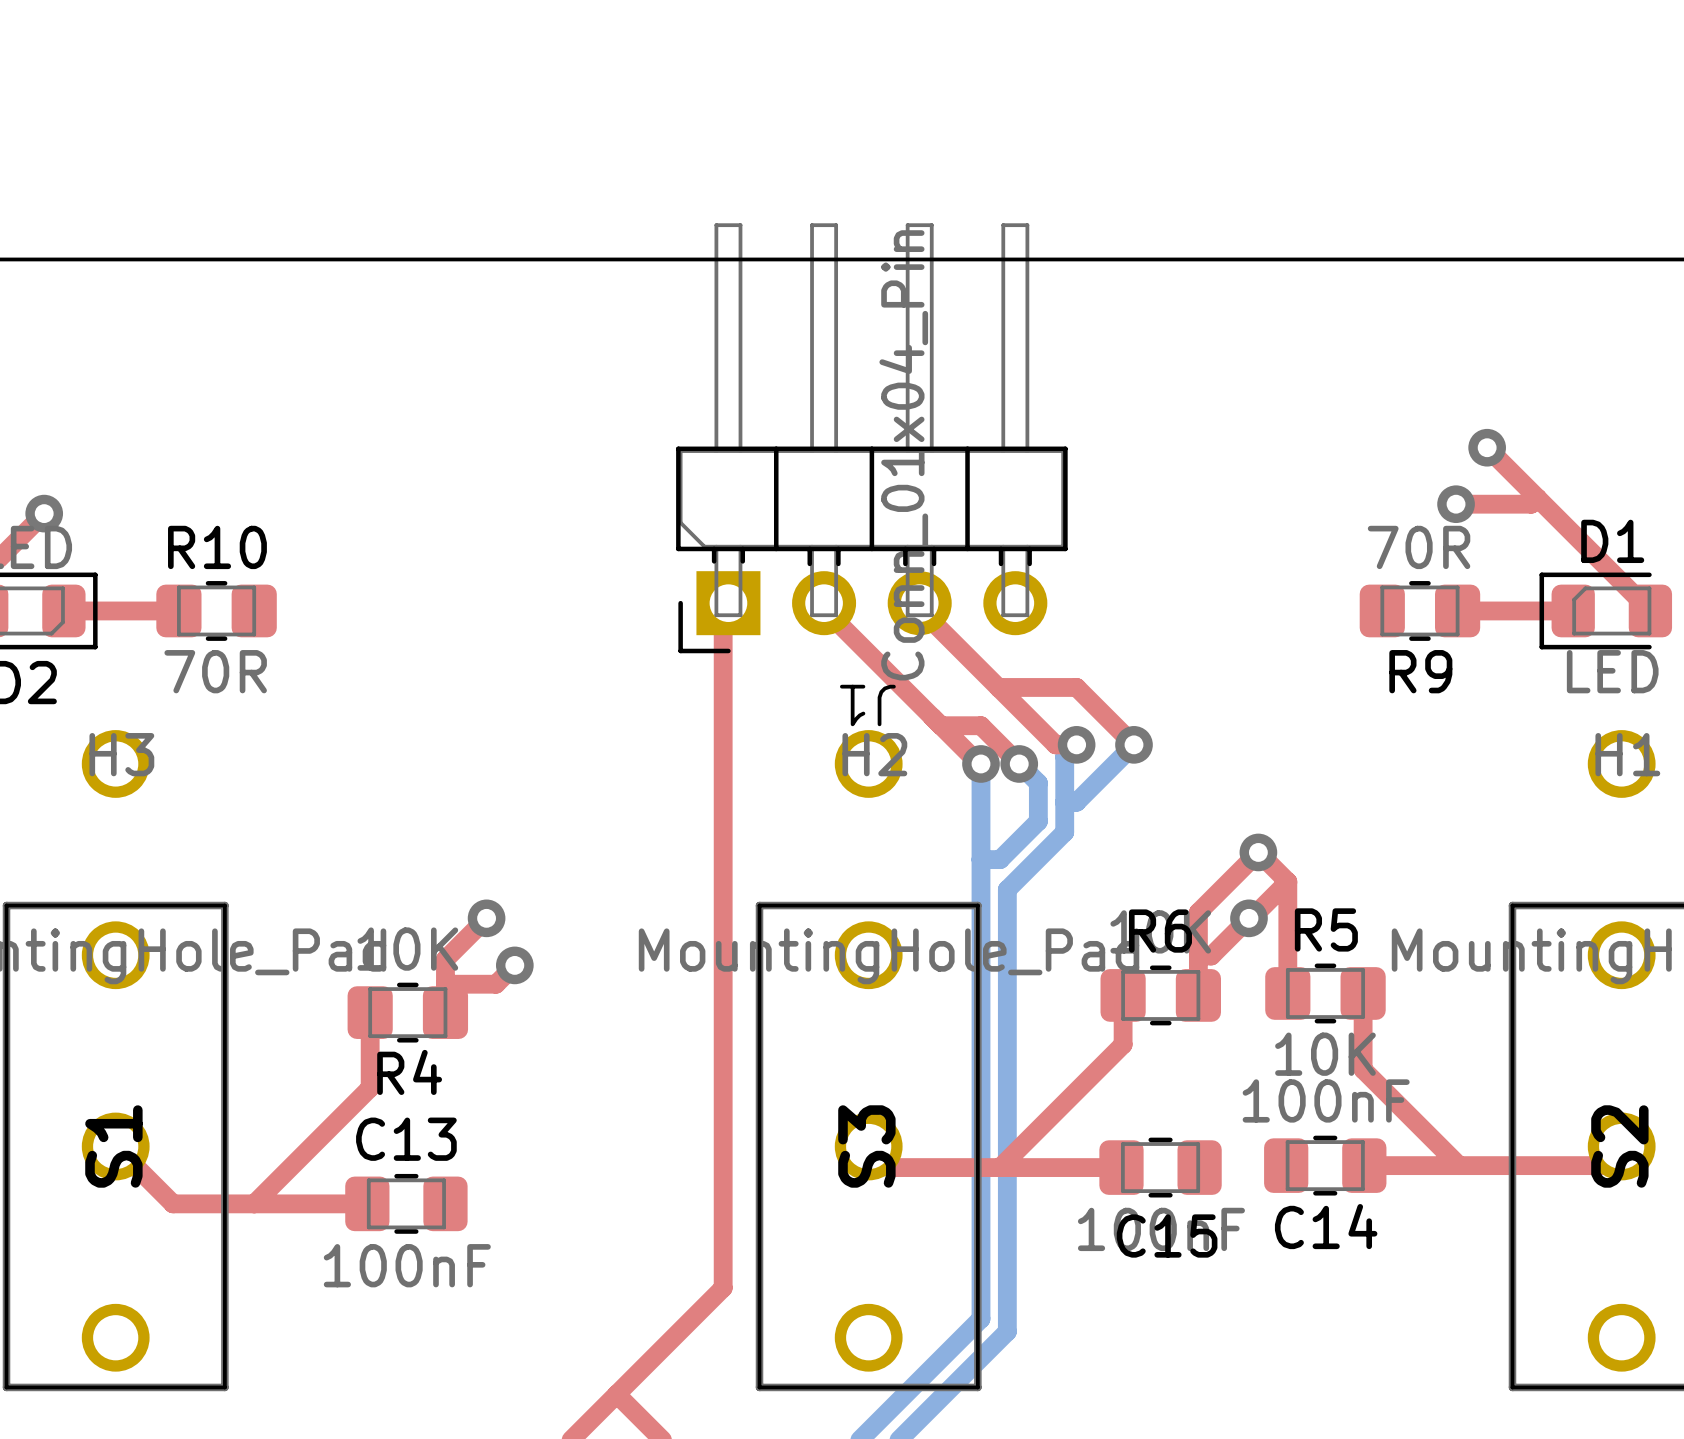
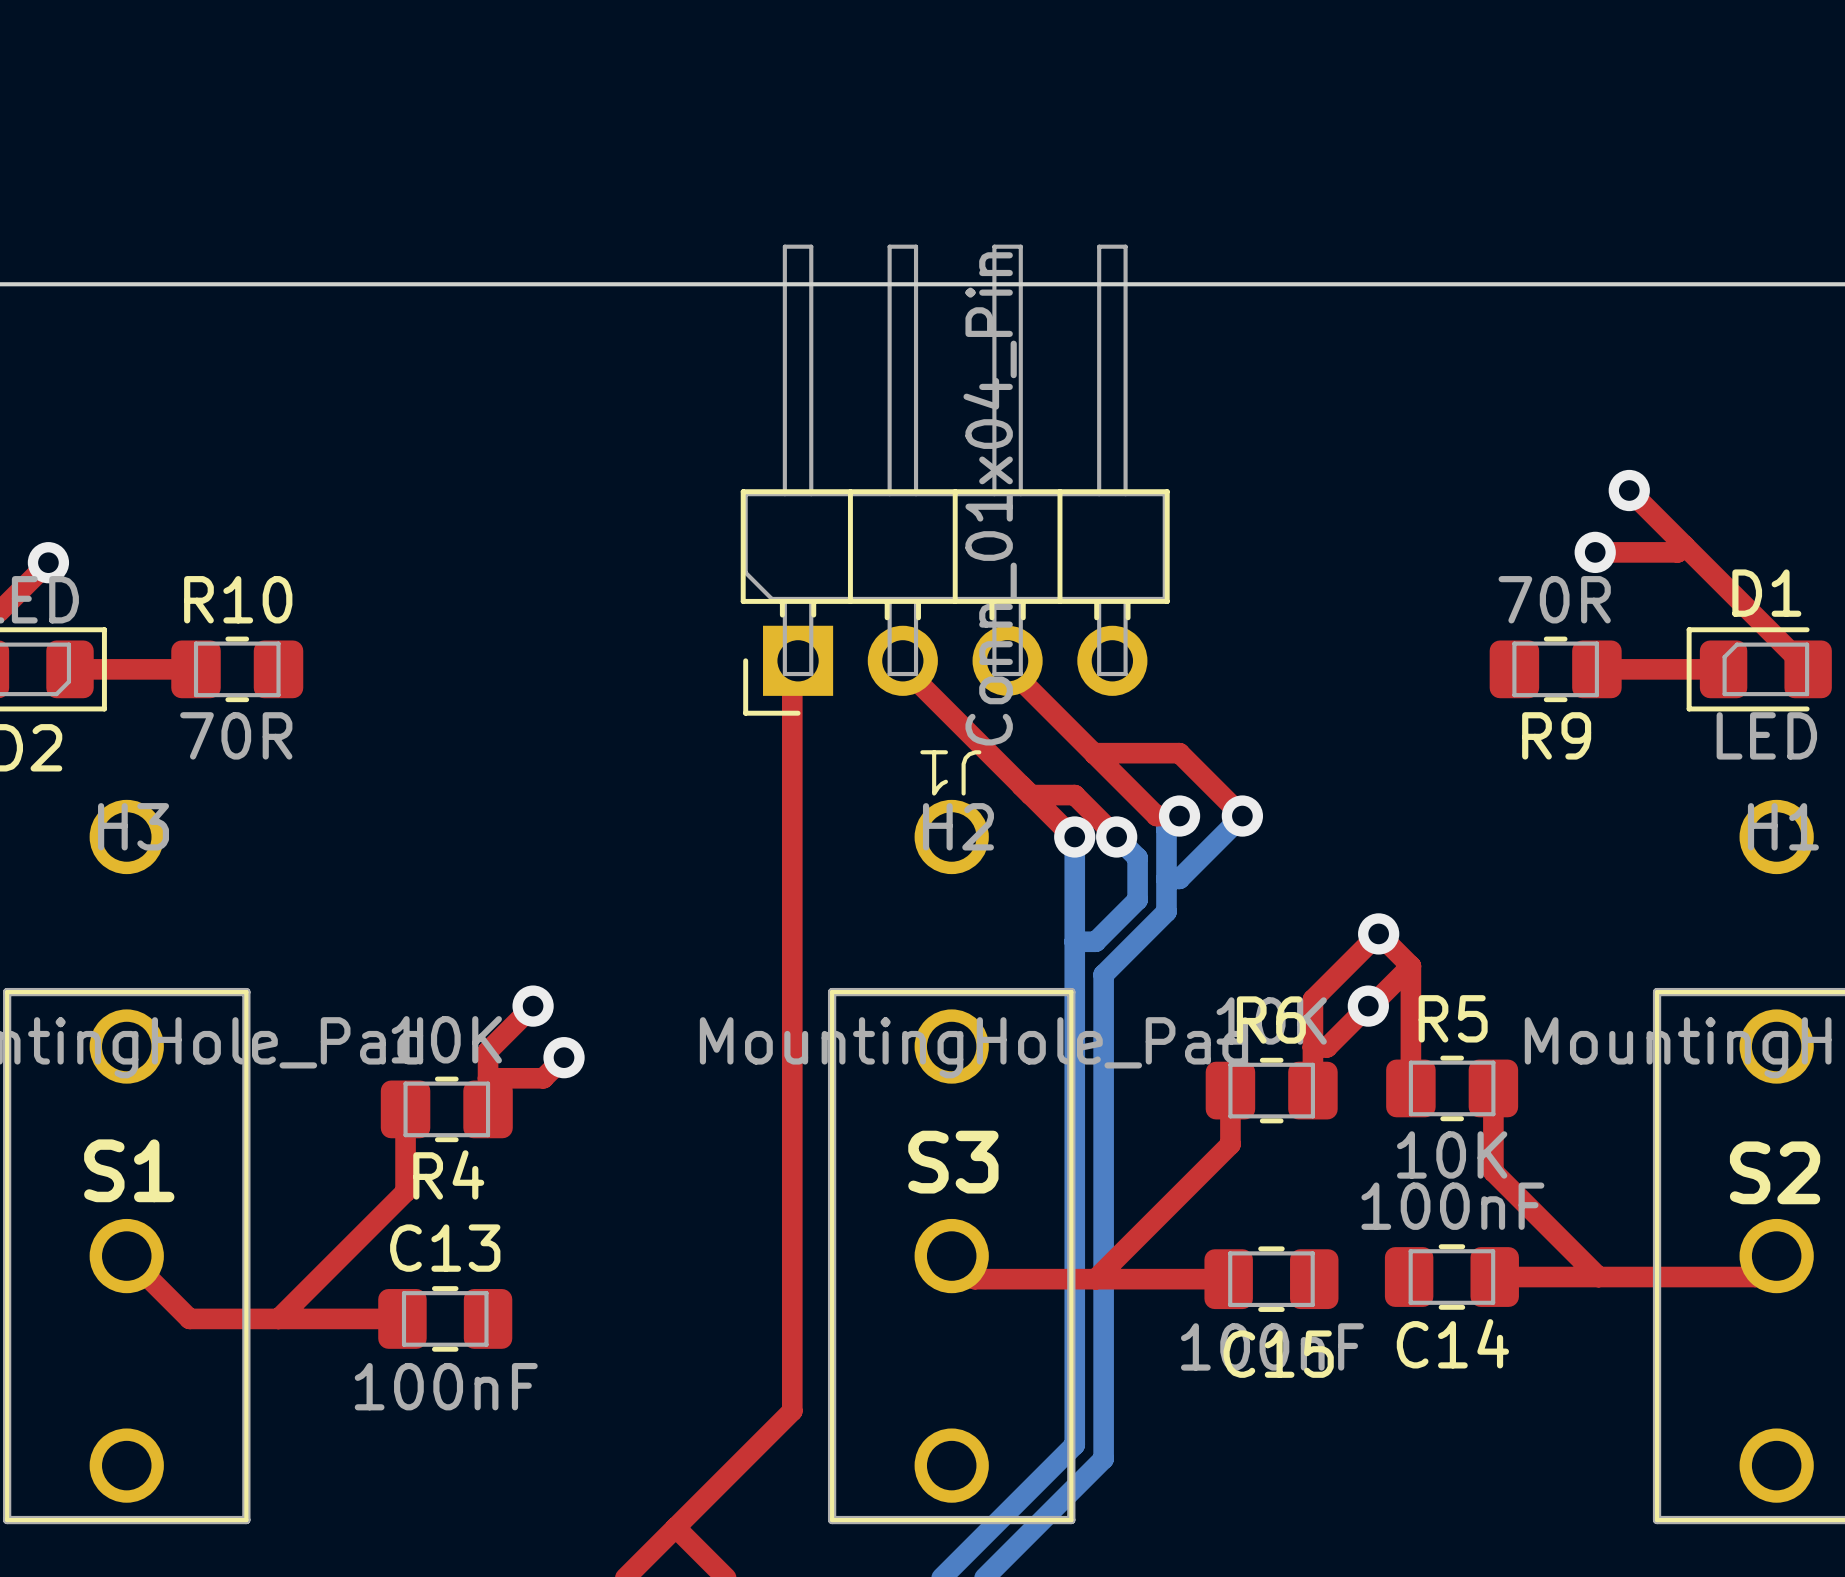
S1 name rotation: 0° (113, 1146) -> 90° clockwise (129, 1170)
S3 name rotation: 0° (866, 1146) -> 90° clockwise (953, 1162)
S2 name rotation: 0° (1619, 1146) -> 90° clockwise (1775, 1172)

